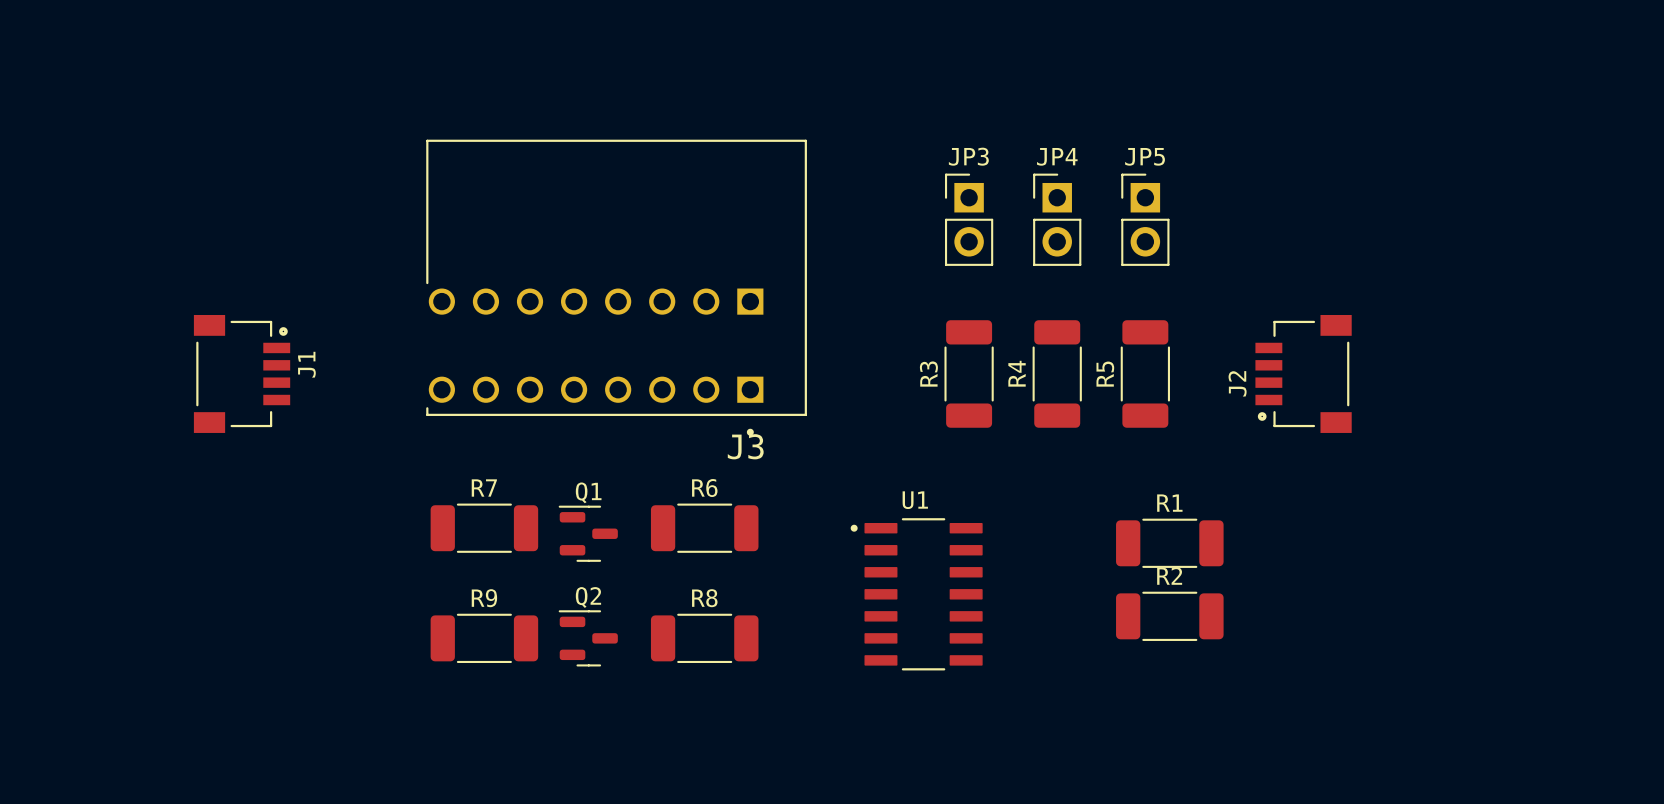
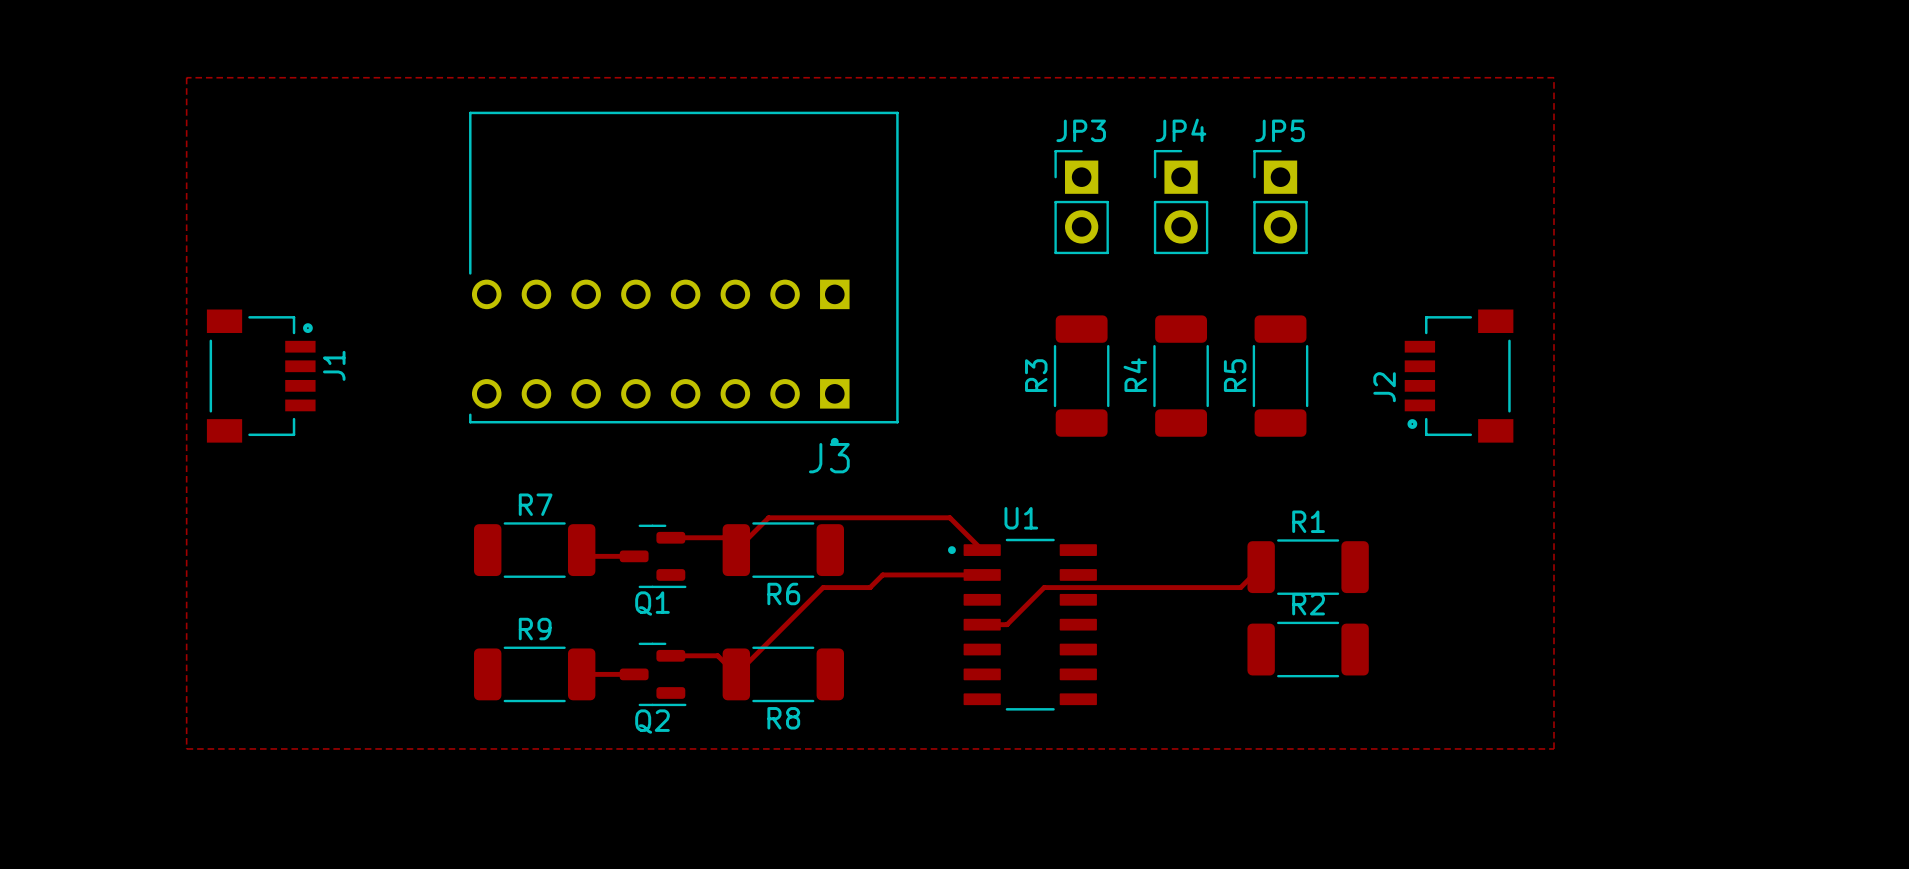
zone outline: none -> (186, 77) (186, 748) (1553, 748) (1553, 77) (186, 77)
R6 name position: R6 (704, 488) -> R6 (783, 593)
track: none -> (670, 537) (723, 537) (736, 550) (768, 517) (949, 517) (982, 550)
track: none -> (581, 550) (587, 556) (634, 556)
Q1 rotation: 0° (588, 533) -> 180° (653, 556)
track: none -> (1261, 567) (1240, 587) (1044, 587) (1007, 624) (982, 624)
track: none -> (982, 574) (882, 574) (870, 587) (823, 587) (736, 674) (717, 655) (670, 655)
R8 name position: R8 (704, 598) -> R8 (783, 718)
track: none -> (581, 674) (634, 674)
Q2 rotation: 0° (588, 638) -> 180° (653, 674)

